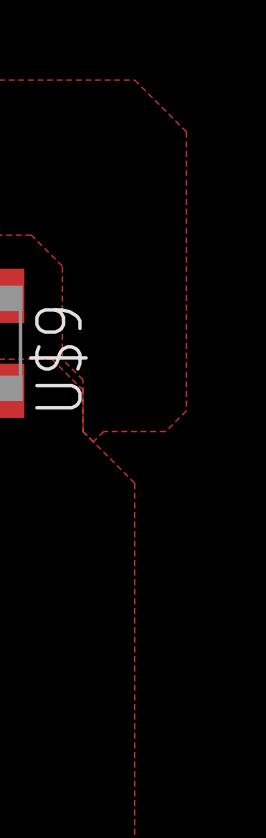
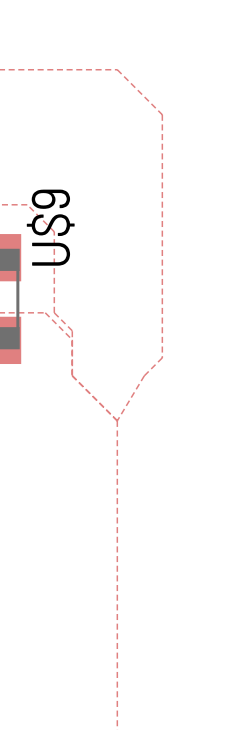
U$9 name position: U$9 (58, 358) -> U$9 (50, 227)
zone outline: (165, 431) (103, 431) (93, 441) -> (144, 375) (117, 420)

